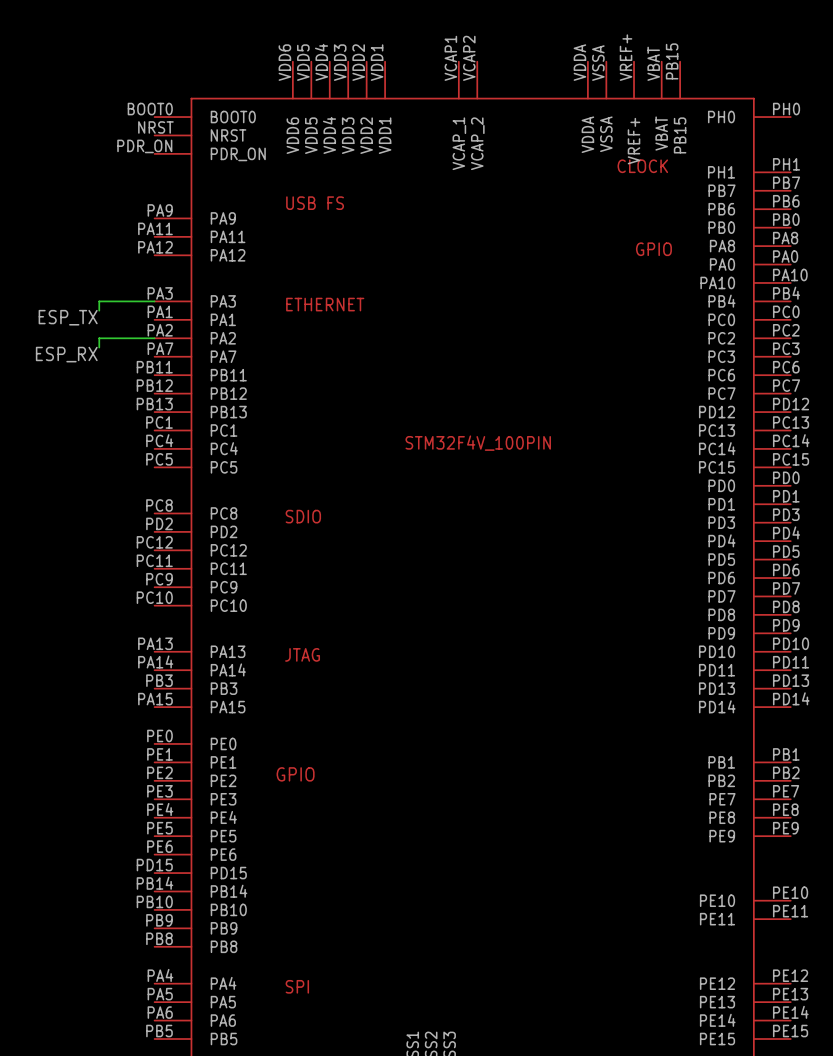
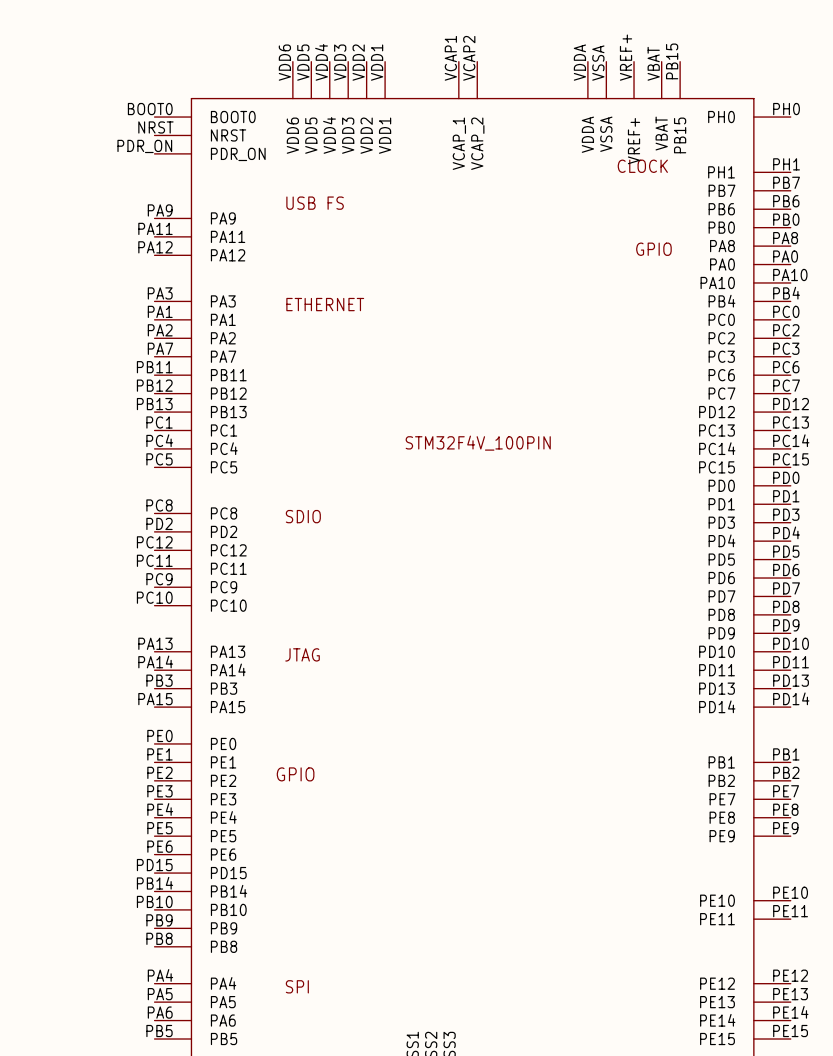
wire: (154, 301) (99, 301) (99, 310) -> none
label: ESP_TX (68, 317) -> none
wire: (154, 338) (99, 338) (99, 347) -> none
label: ESP_RX (66, 354) -> none

